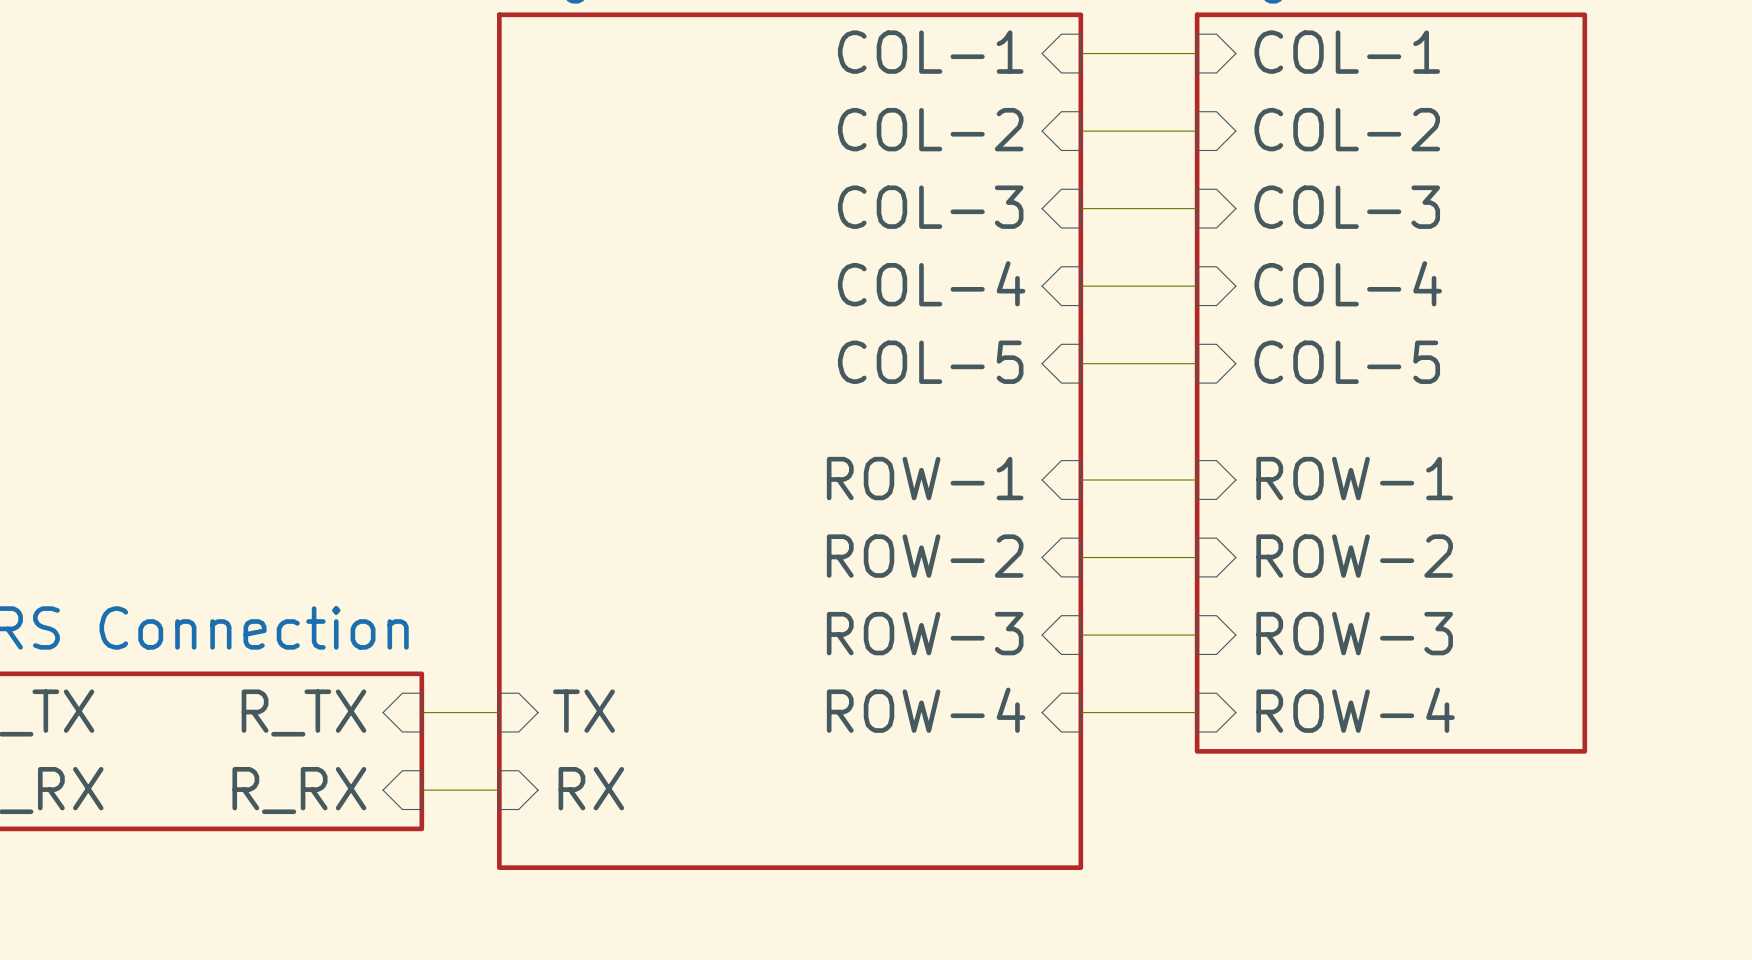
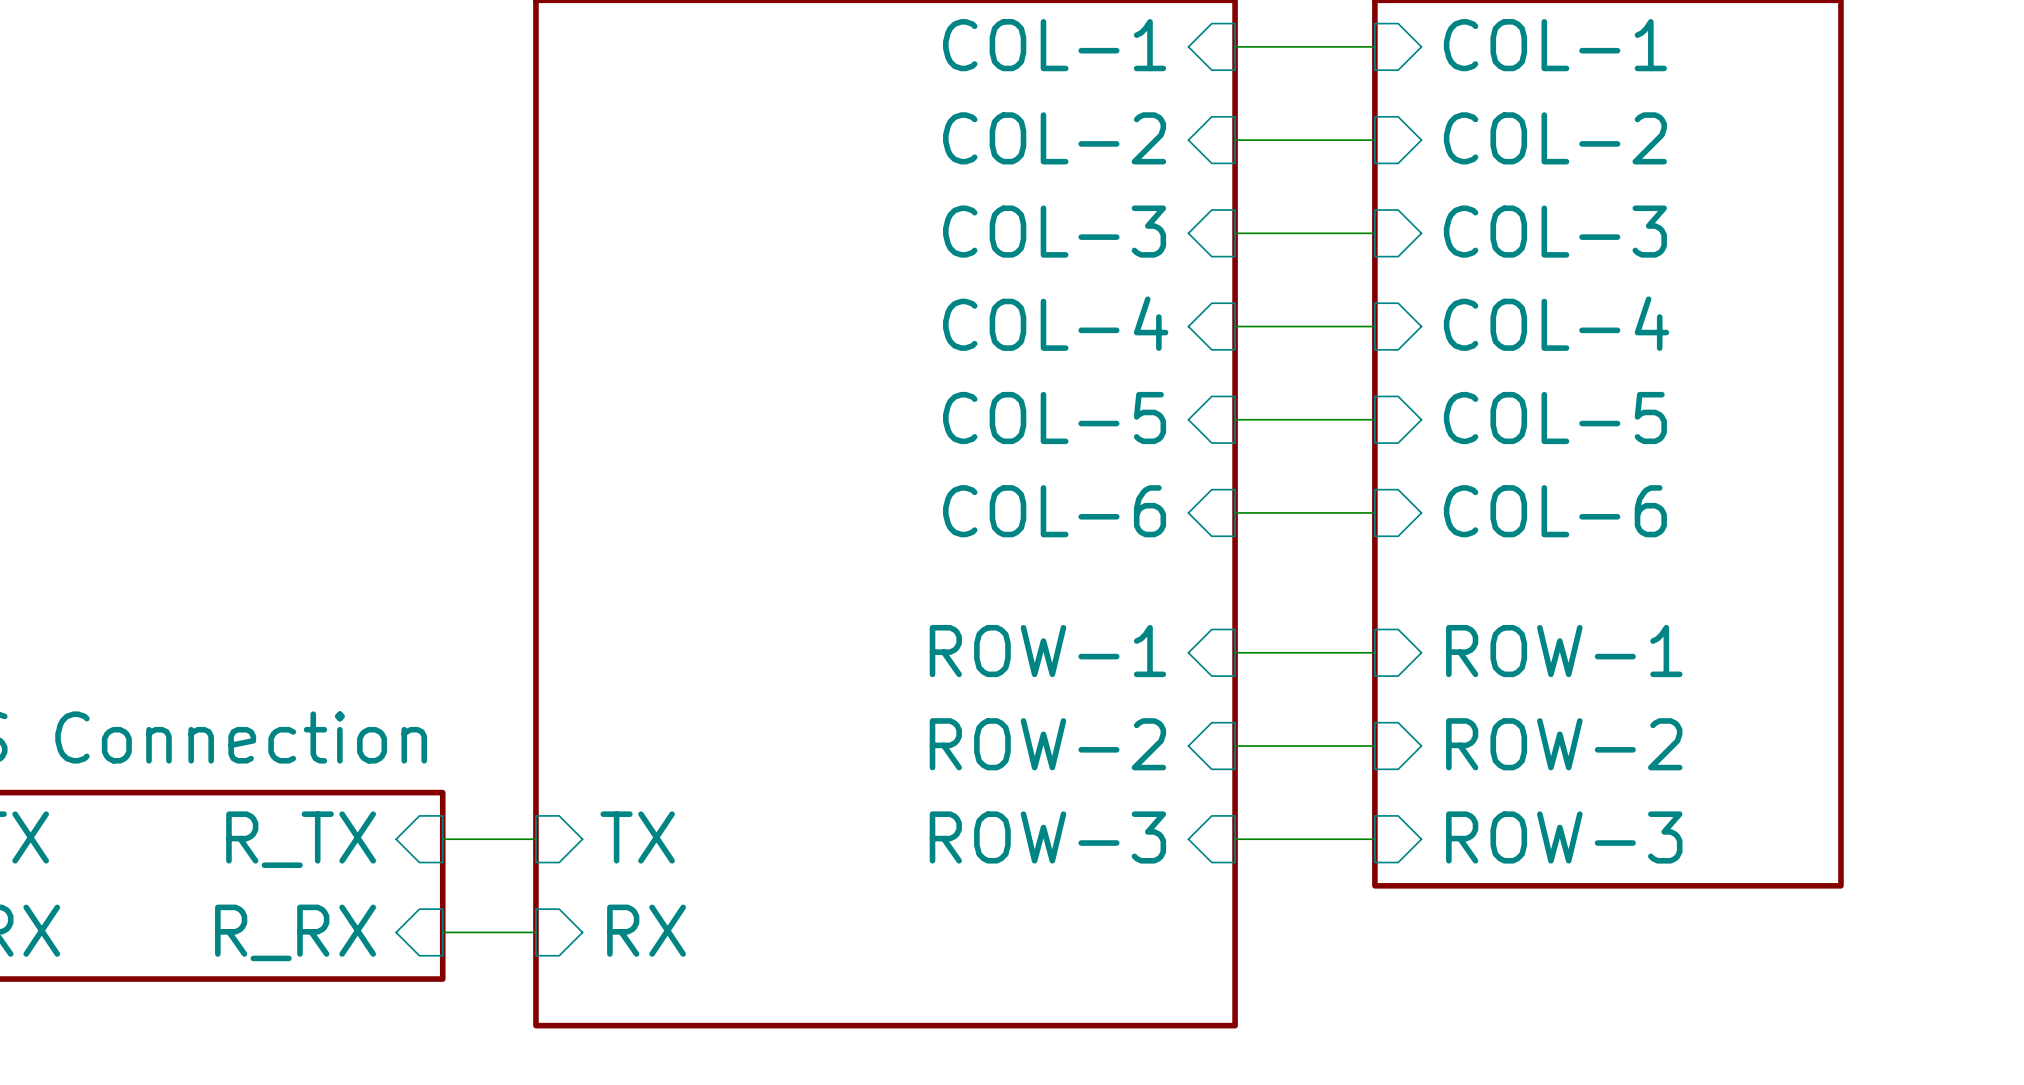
sheet pin: none -> COL-6 (1054, 511)
sheet pin: none -> COL-6 (1555, 511)
sheet pin: ROW-1 (925, 478) -> none
sheet pin: ROW-1 (1354, 478) -> none
wire: (1080, 479) (1197, 479) -> (1235, 512) (1374, 512)
sheet pin: ROW-2 (925, 556) -> ROW-1 (1047, 651)
sheet pin: ROW-2 (1354, 556) -> ROW-1 (1564, 651)
sheet pin: ROW-3 (925, 633) -> ROW-2 (1047, 744)
sheet pin: ROW-3 (1354, 633) -> ROW-2 (1564, 744)
sheet pin: ROW-4 (926, 710) -> ROW-3 (1047, 837)
sheet pin: ROW-4 (1355, 710) -> ROW-3 (1564, 837)

